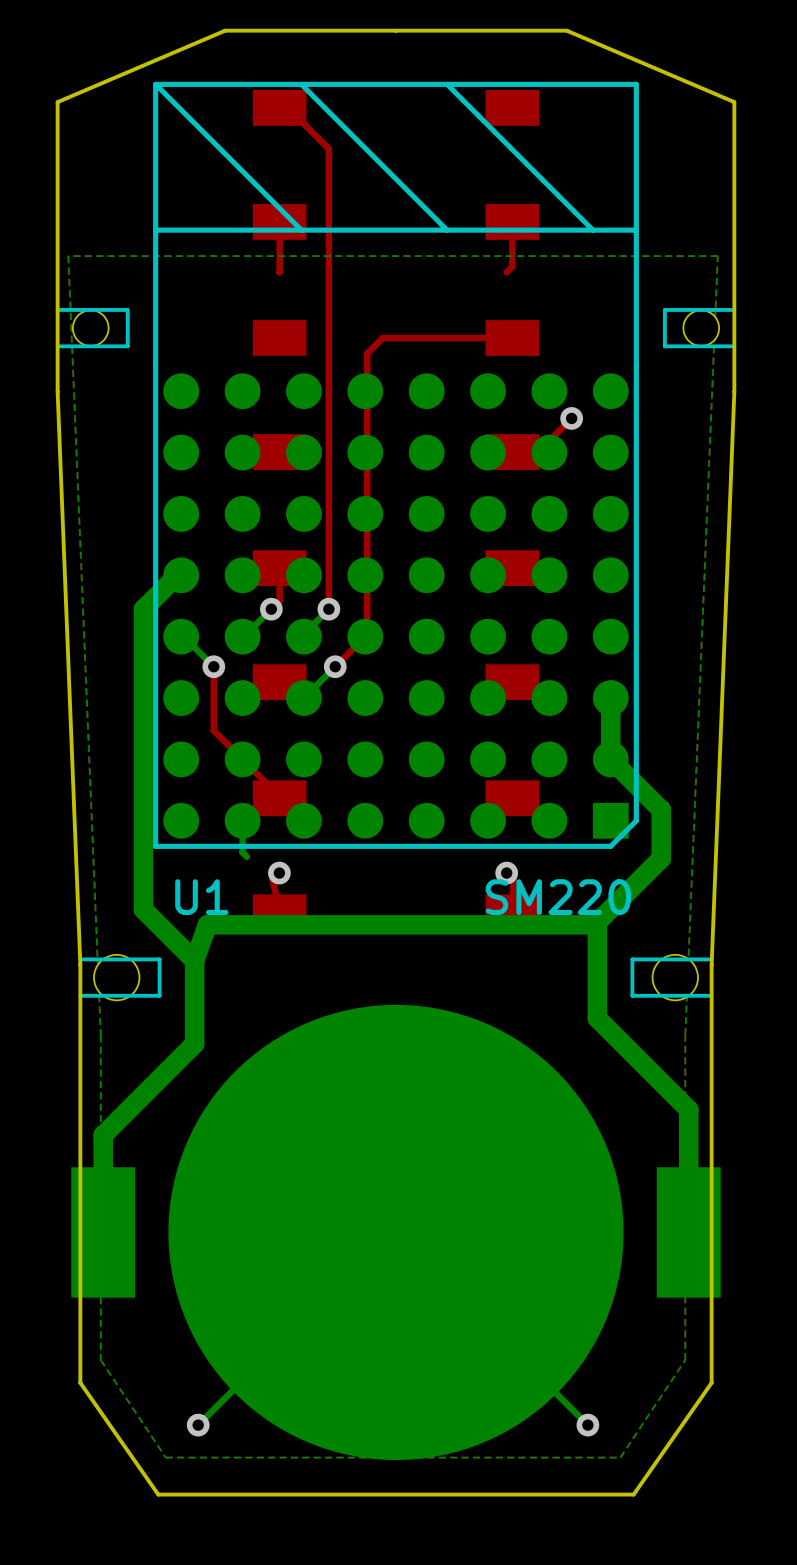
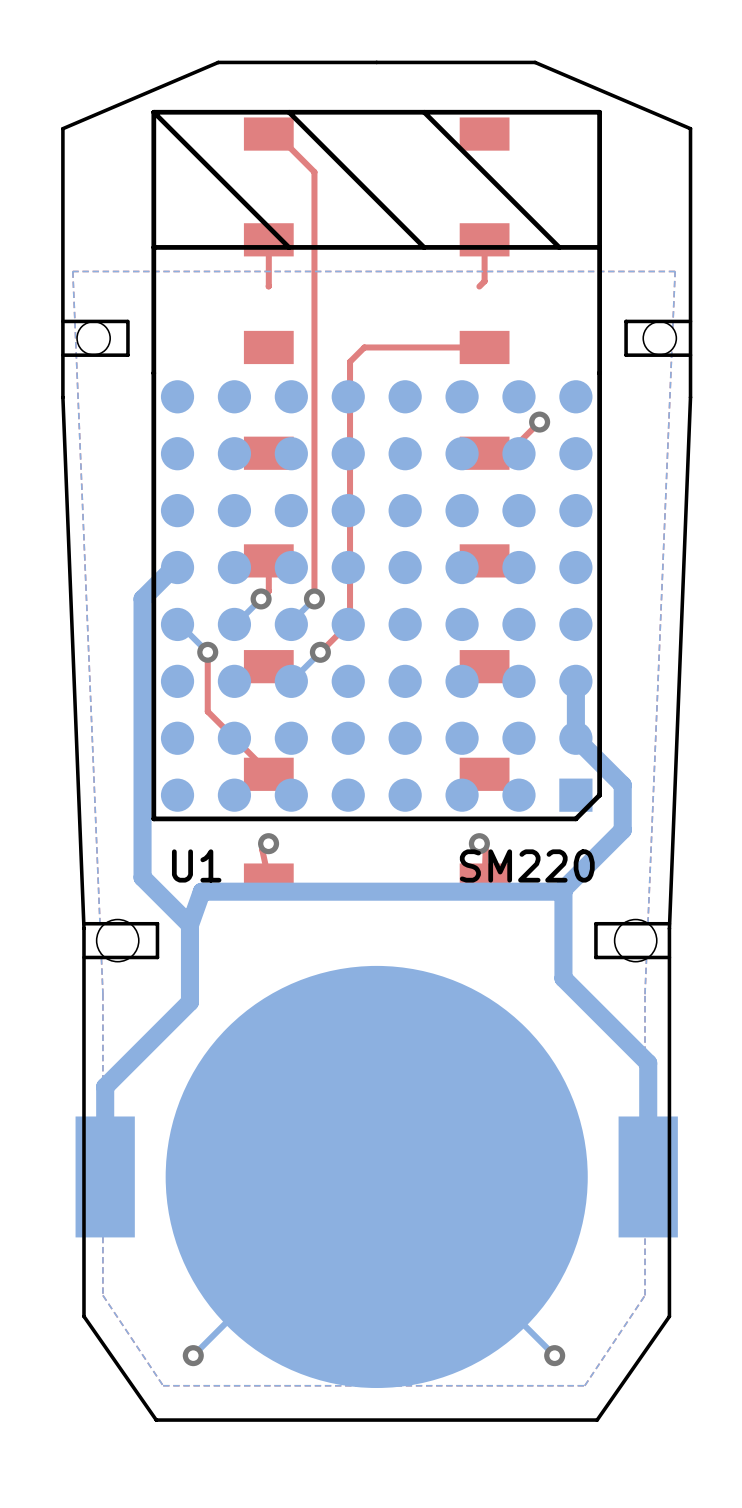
bottom track: (242, 820) (242, 852) (246, 856) -> none

